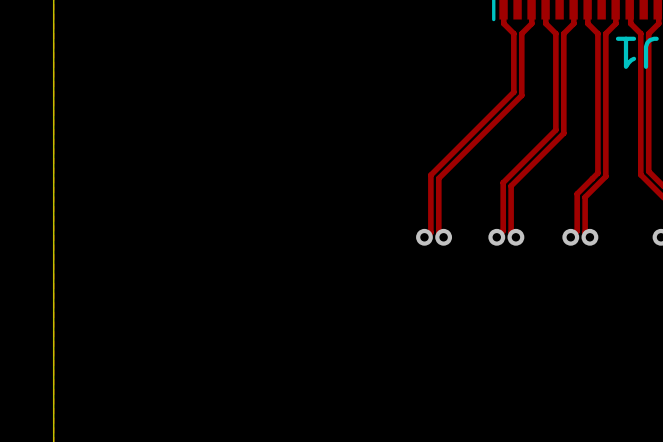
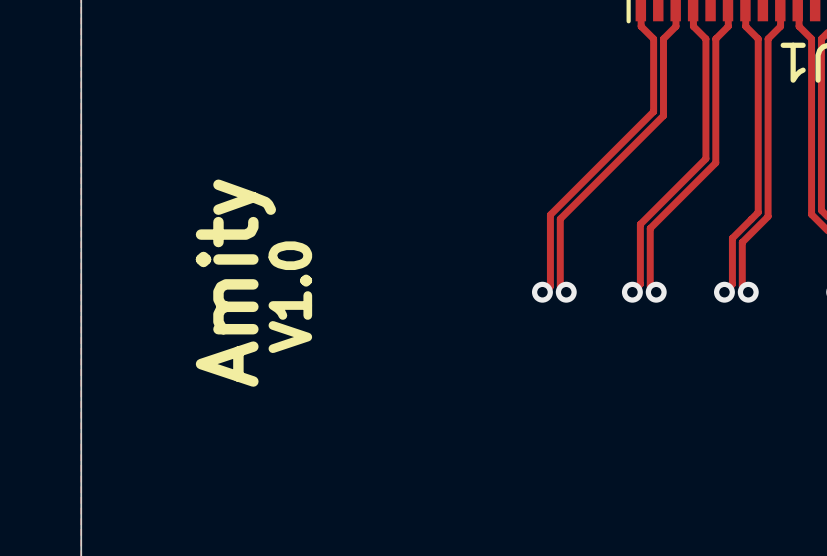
text: none -> Amity (235, 283)
text: none -> V1.0 (290, 297)

